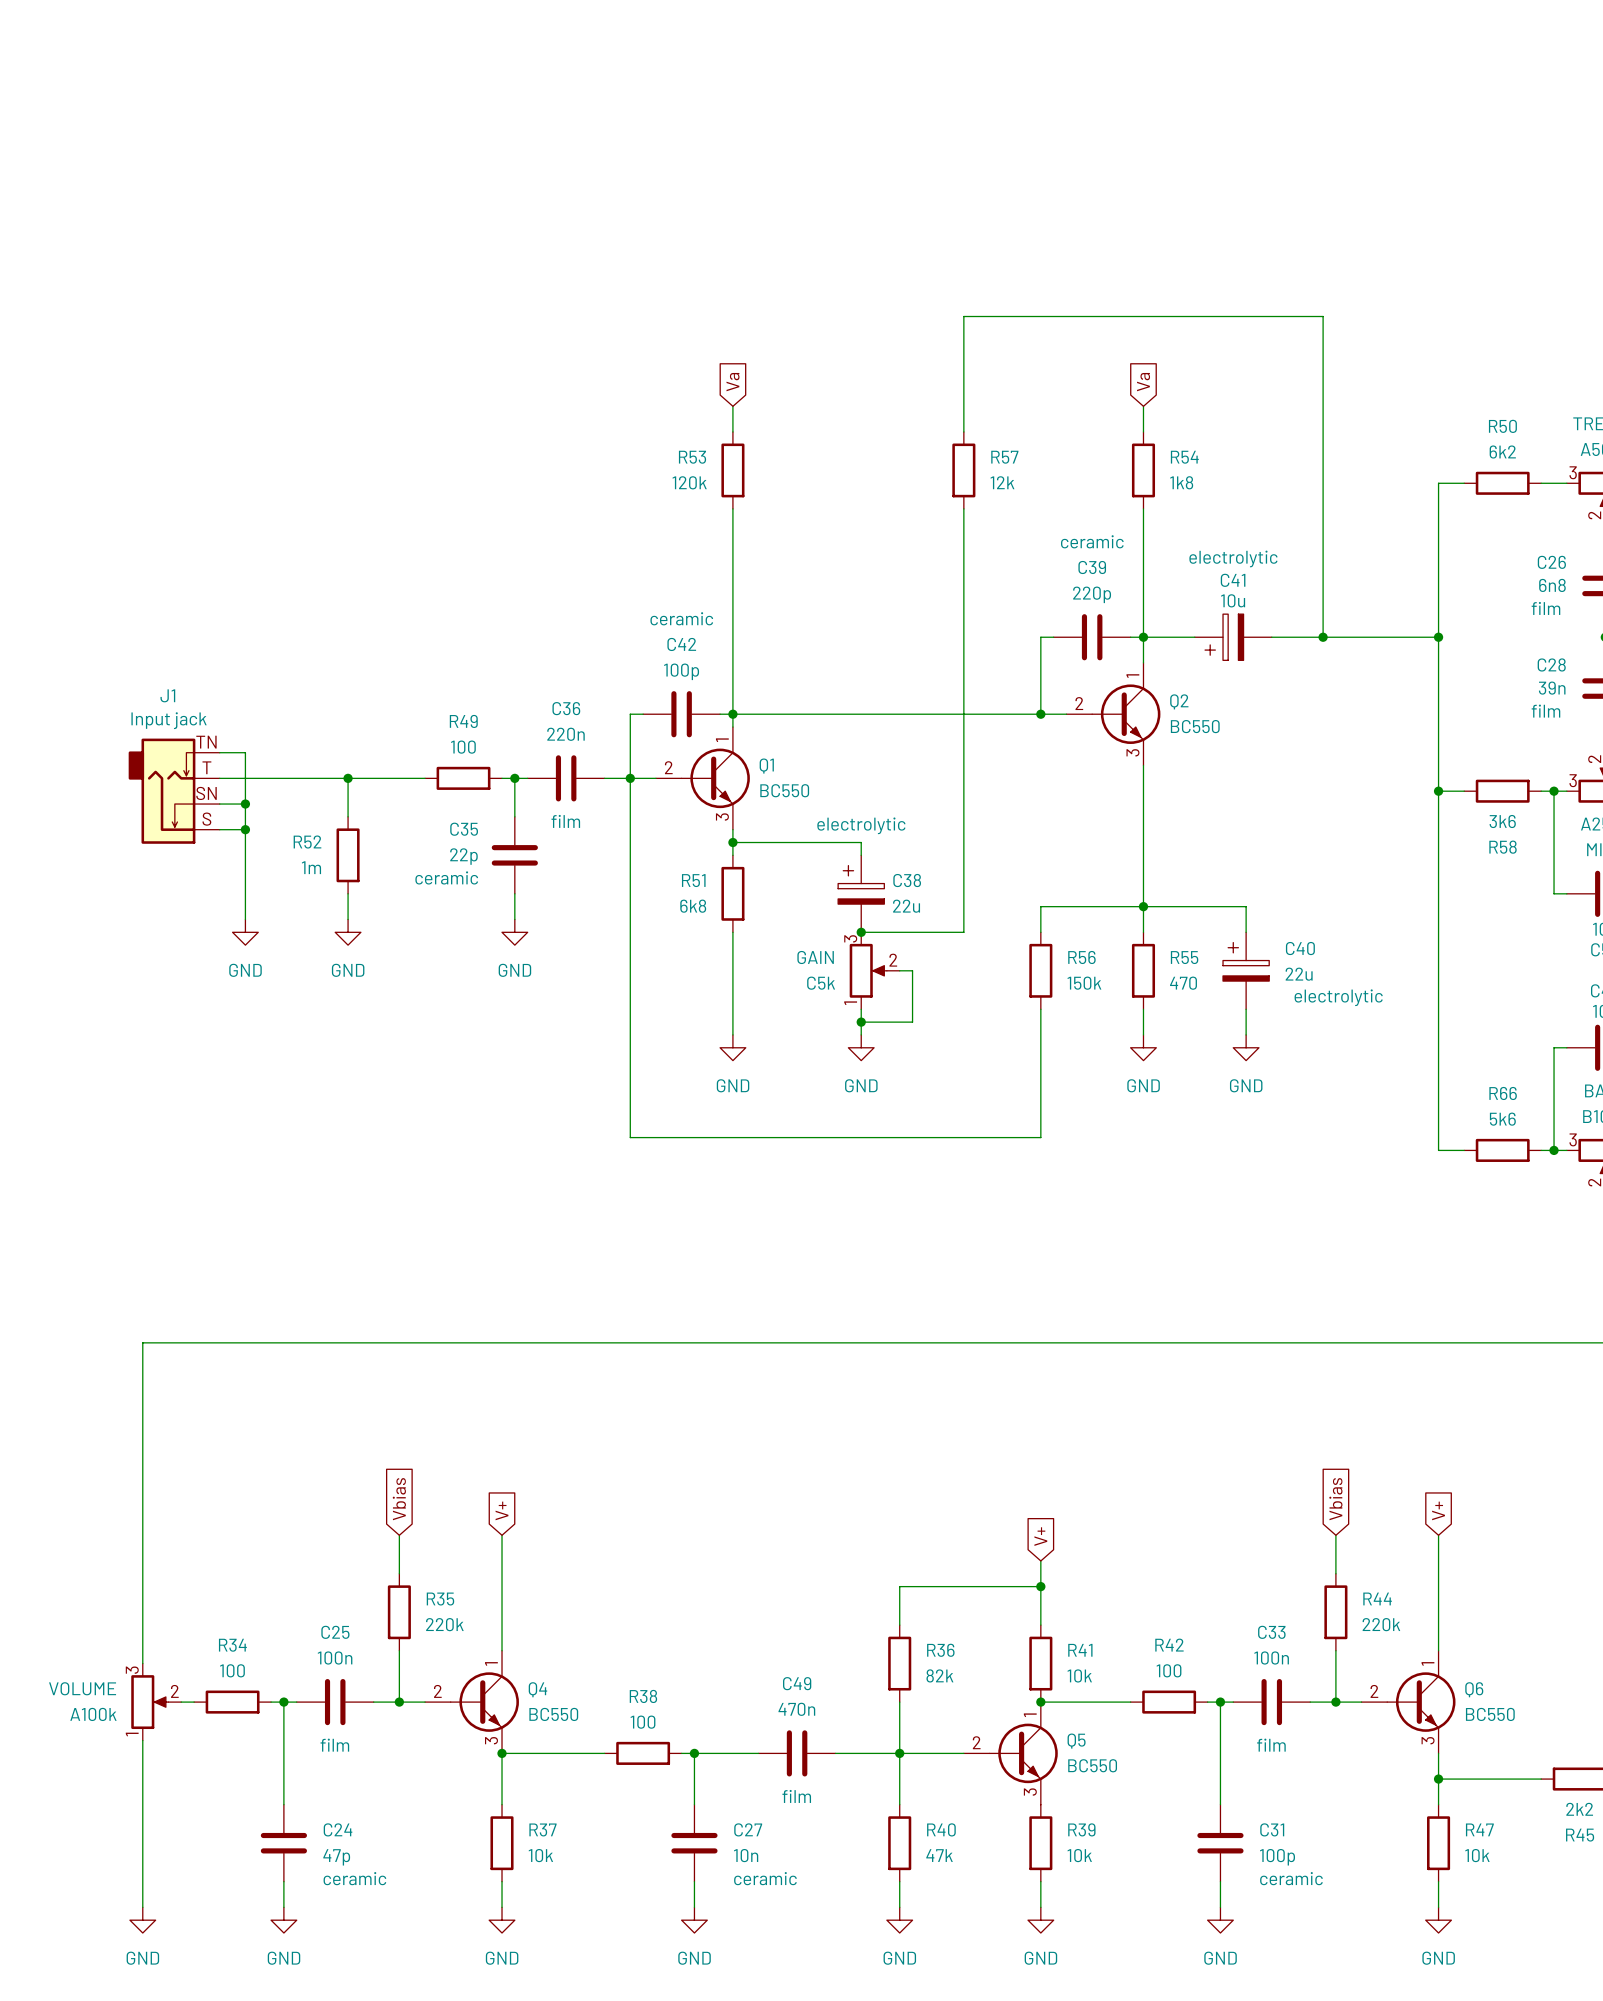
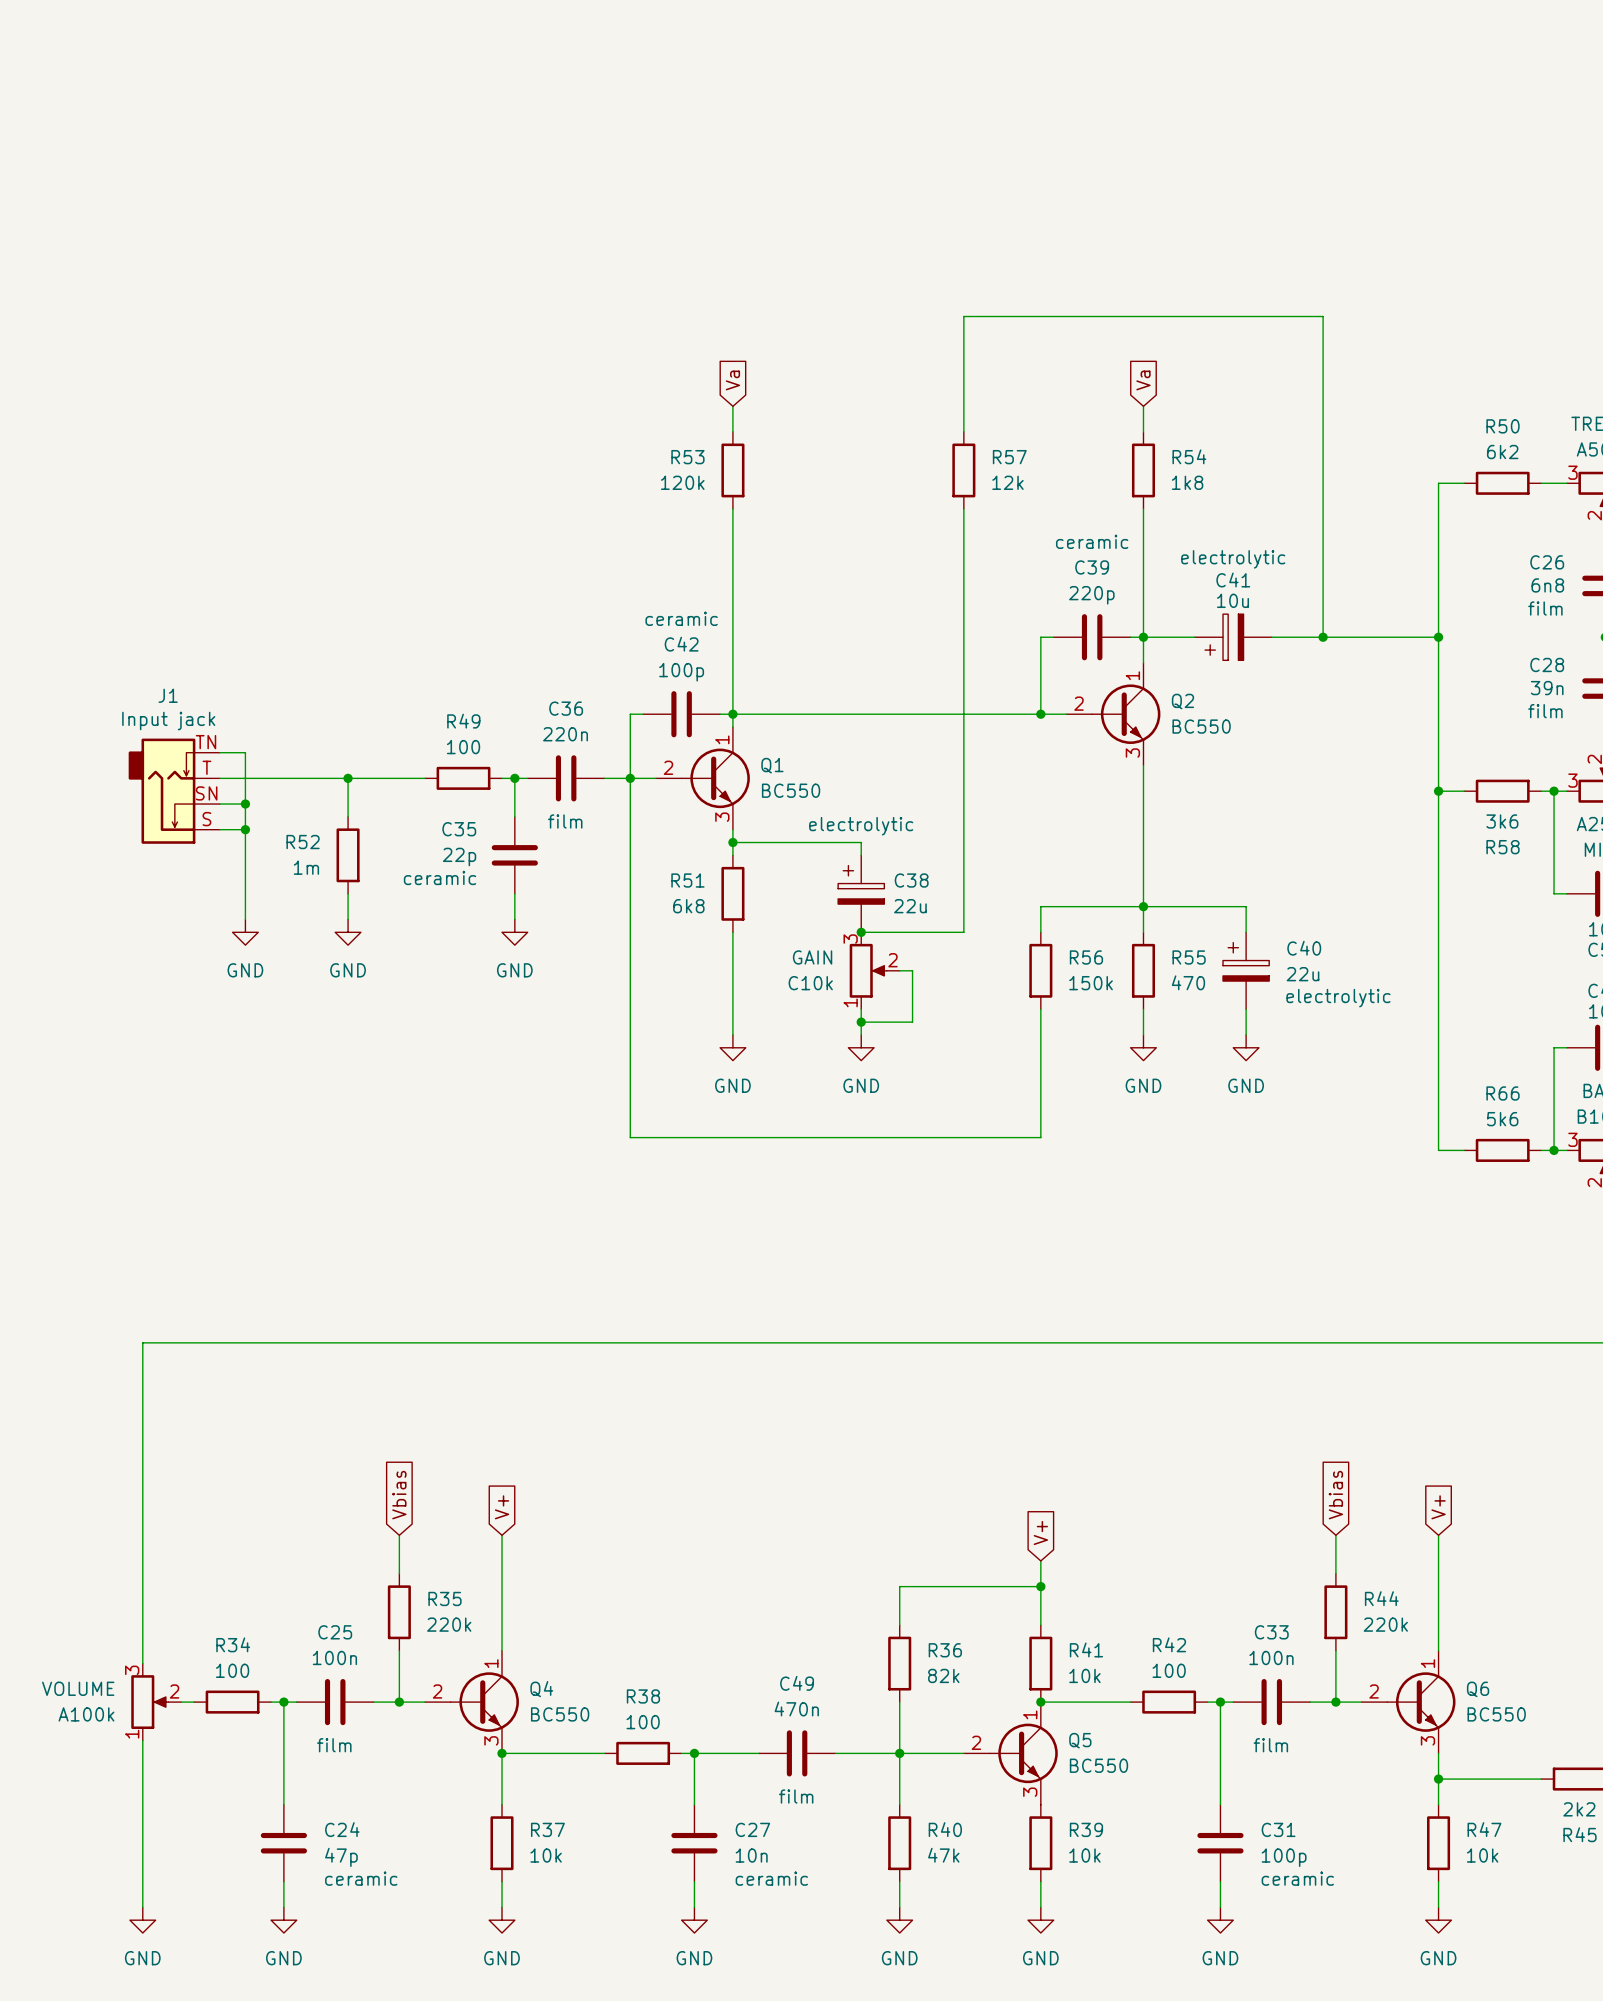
GAIN value: C5k (821, 983) -> C10k (810, 983)

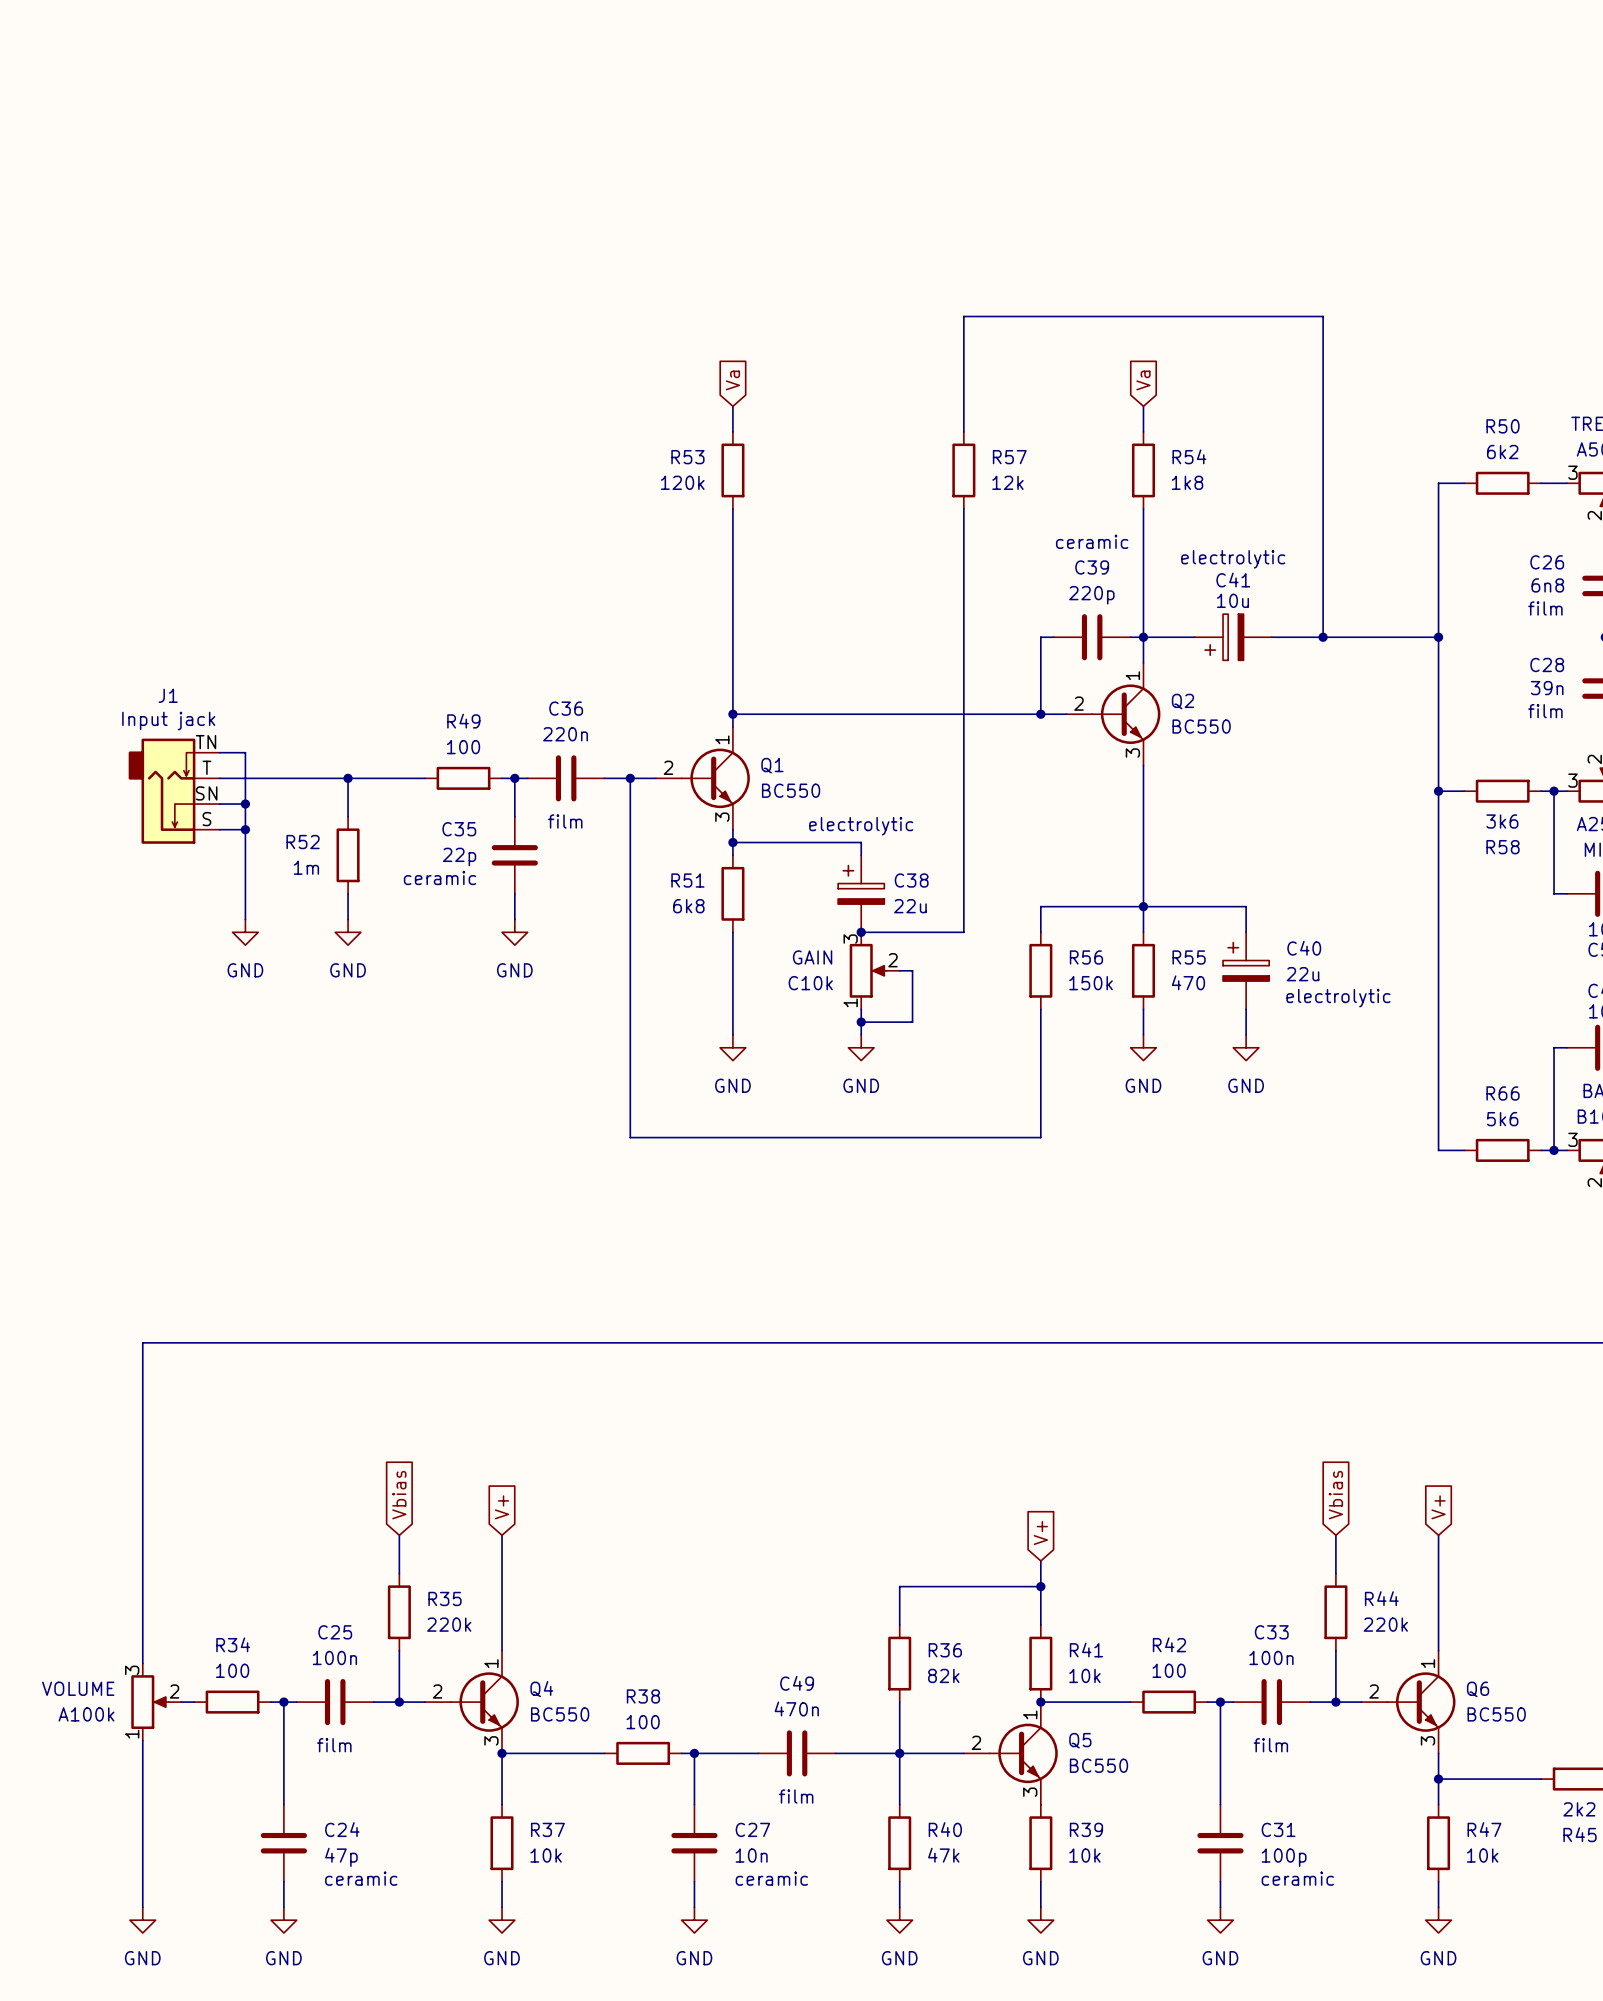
wire: (643, 714) (630, 714) (630, 778) -> none
C42: 100p (681, 714) -> none
wire: (720, 714) (732, 714) -> none

